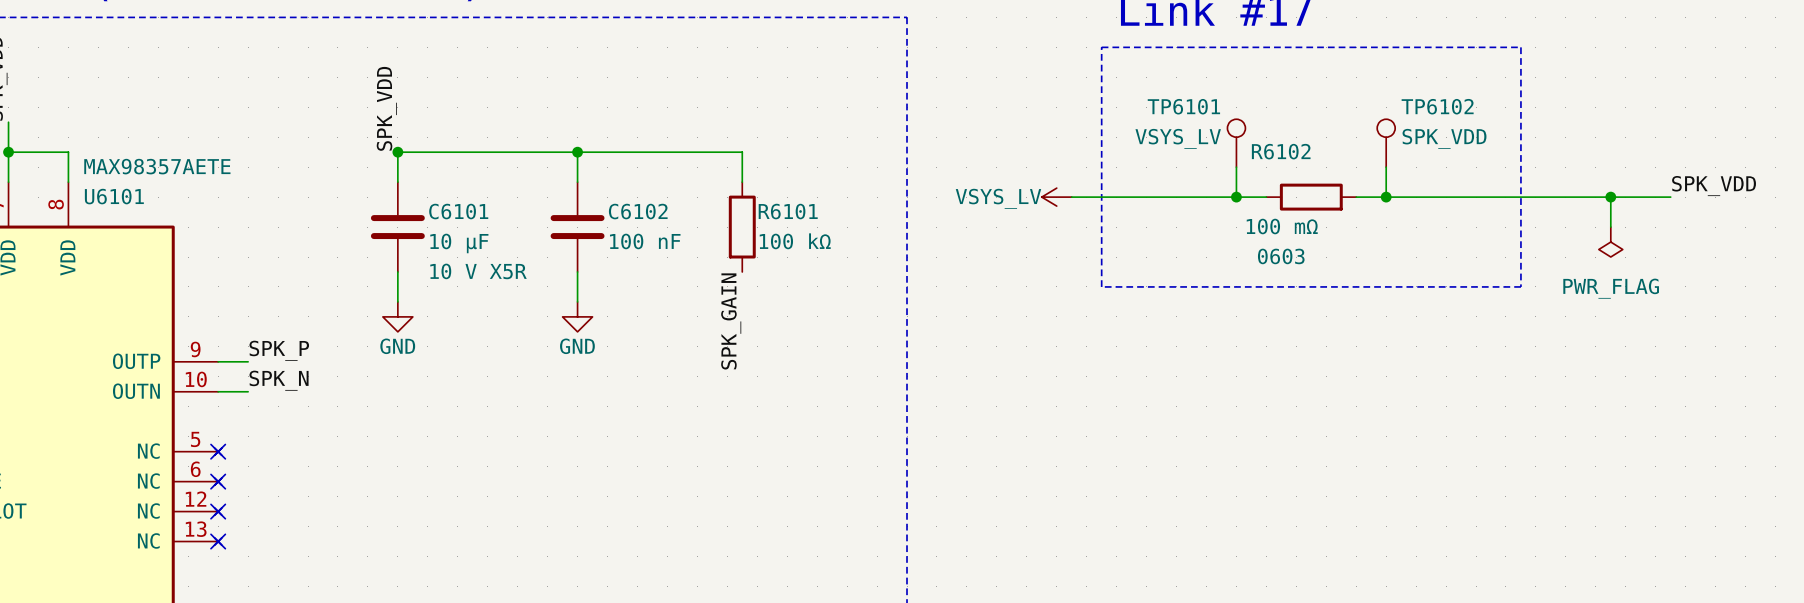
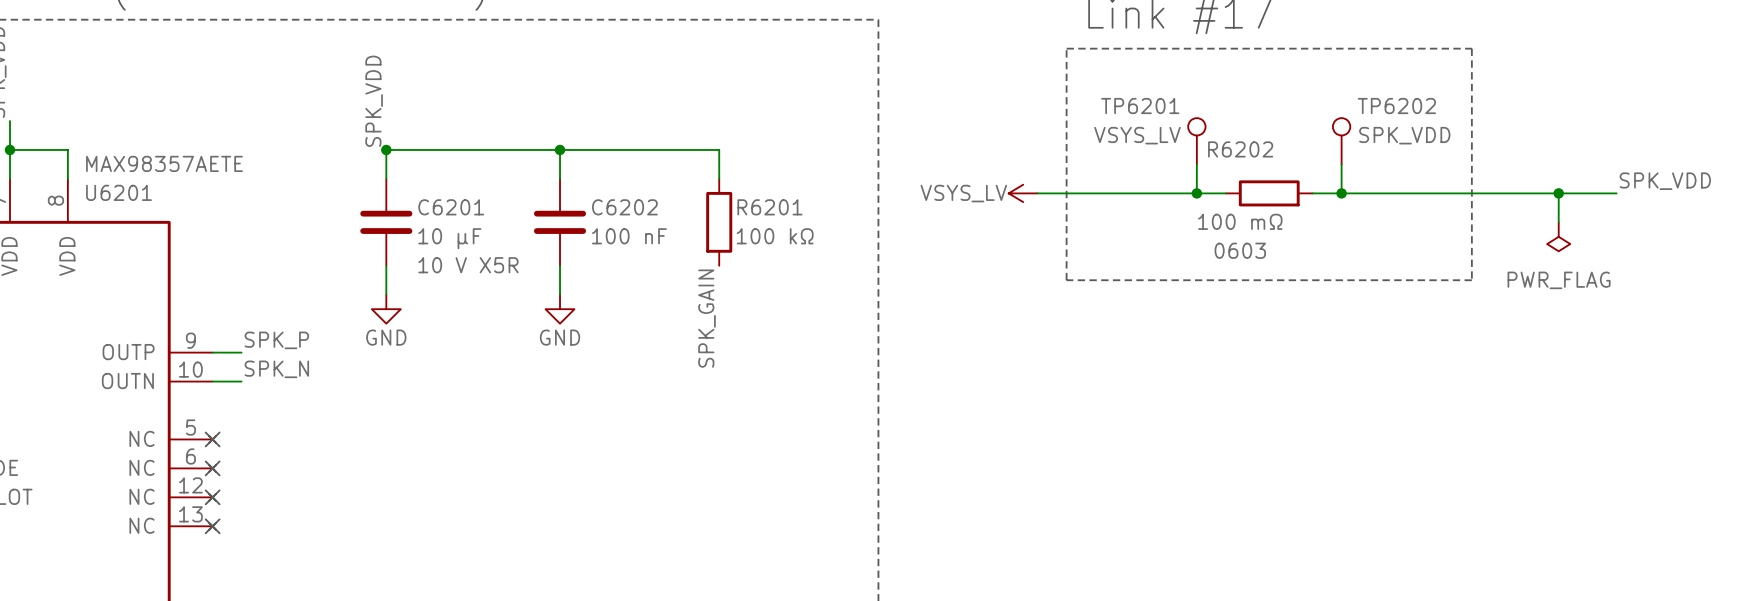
TP6101 name: TP6101 (1183, 106) -> TP6201 (1140, 106)
TP6102 name: TP6102 (1437, 106) -> TP6202 (1396, 106)
R6102 name: R6102 (1281, 151) -> R6202 (1240, 149)
U6101 name: U6101 (114, 196) -> U6201 (119, 192)
C6101 name: C6101 (458, 211) -> C6201 (451, 207)
C6102 name: C6102 (638, 211) -> C6202 (624, 207)
R6101 name: R6101 (788, 211) -> R6201 (769, 207)

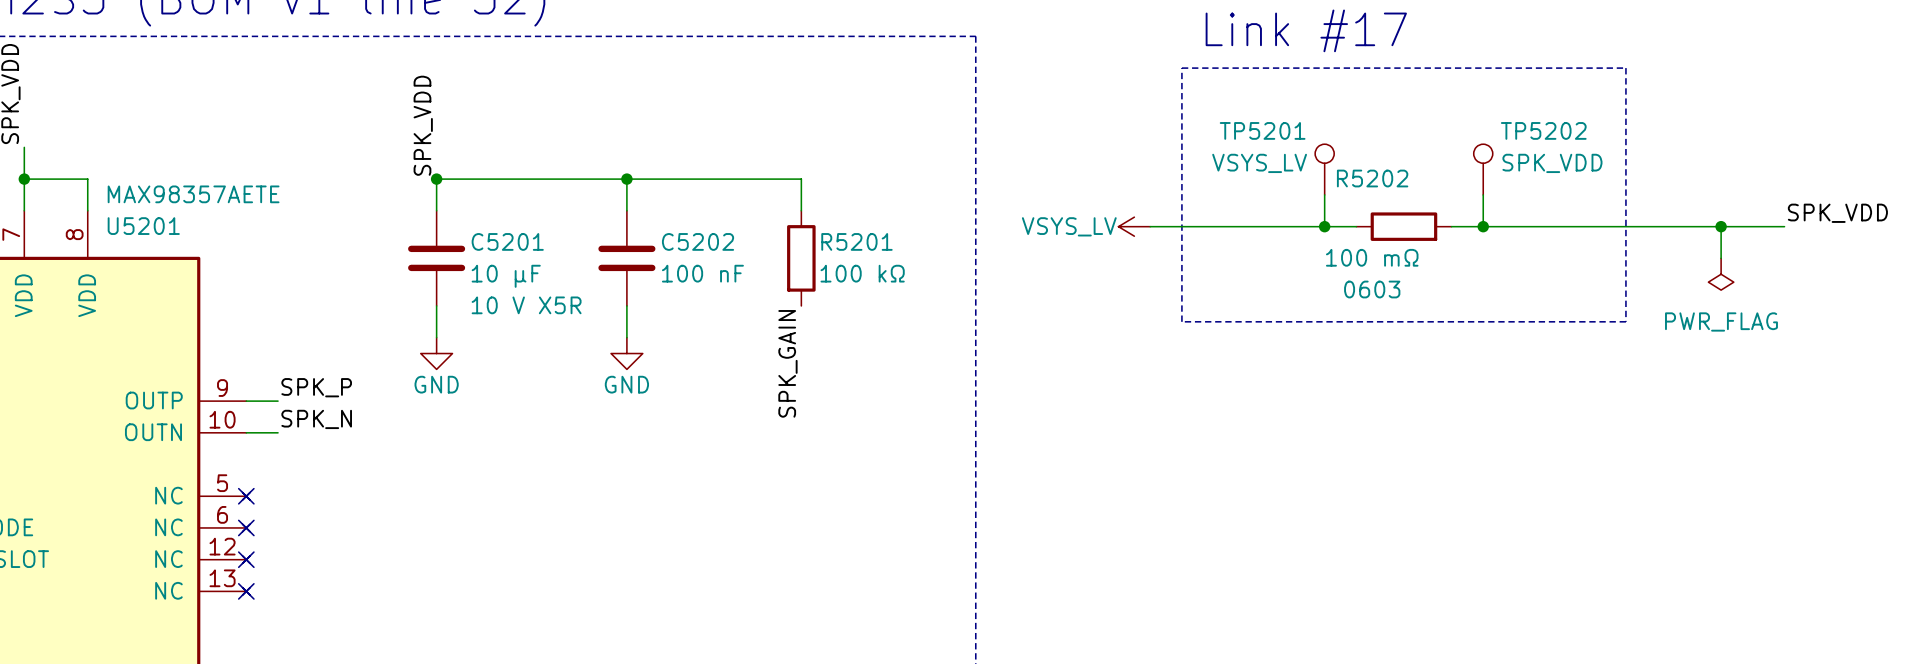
TP6201 name: TP6201 (1140, 106) -> TP5201 (1262, 130)
TP6202 name: TP6202 (1396, 106) -> TP5202 (1543, 130)
R6202 name: R6202 (1240, 149) -> R5202 (1372, 178)
U6201 name: U6201 (119, 192) -> U5201 (143, 226)
C6201 name: C6201 (451, 207) -> C5201 (507, 241)
C6202 name: C6202 (624, 207) -> C5202 (698, 241)
R6201 name: R6201 (769, 207) -> R5201 (856, 241)

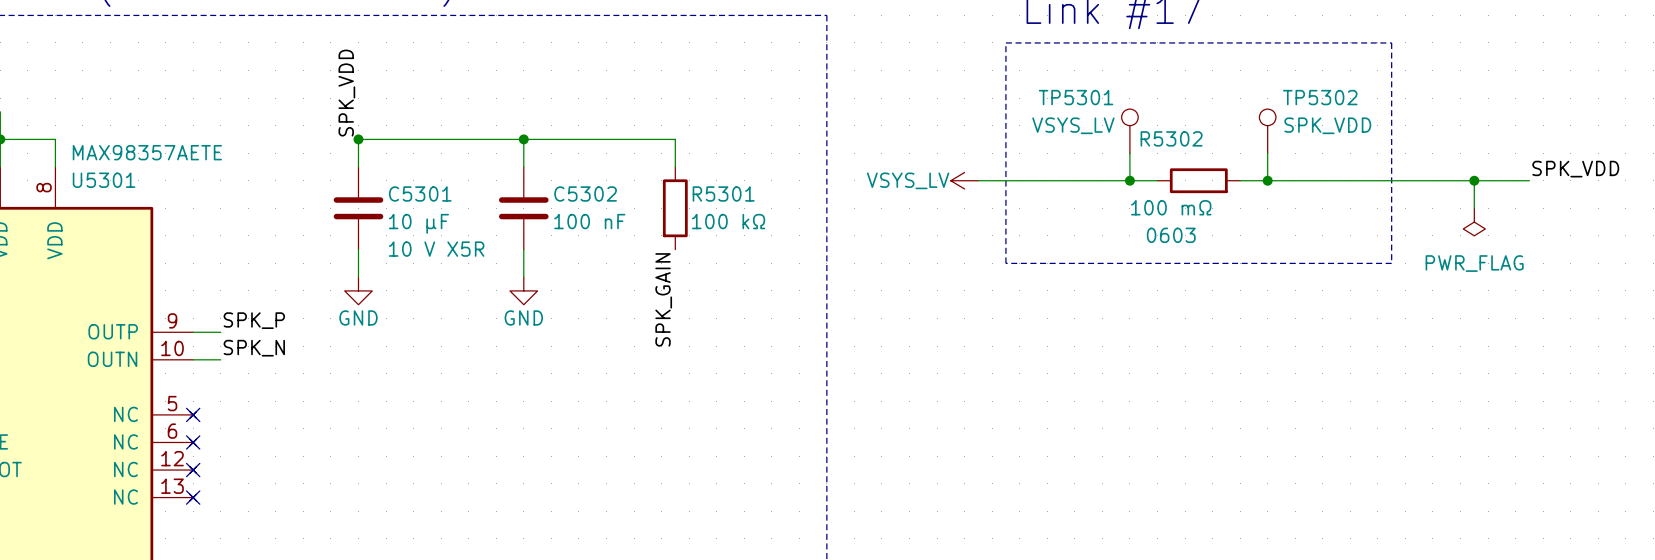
TP5201 name: TP5201 (1262, 130) -> TP5301 (1076, 97)
TP5202 name: TP5202 (1543, 130) -> TP5302 (1320, 97)
R5202 name: R5202 (1372, 178) -> R5302 (1171, 138)
U5201 name: U5201 (143, 226) -> U5301 (104, 180)
C5201 name: C5201 (507, 241) -> C5301 (420, 193)
C5202 name: C5202 (698, 241) -> C5302 (585, 193)
R5201 name: R5201 (856, 241) -> R5301 (723, 193)

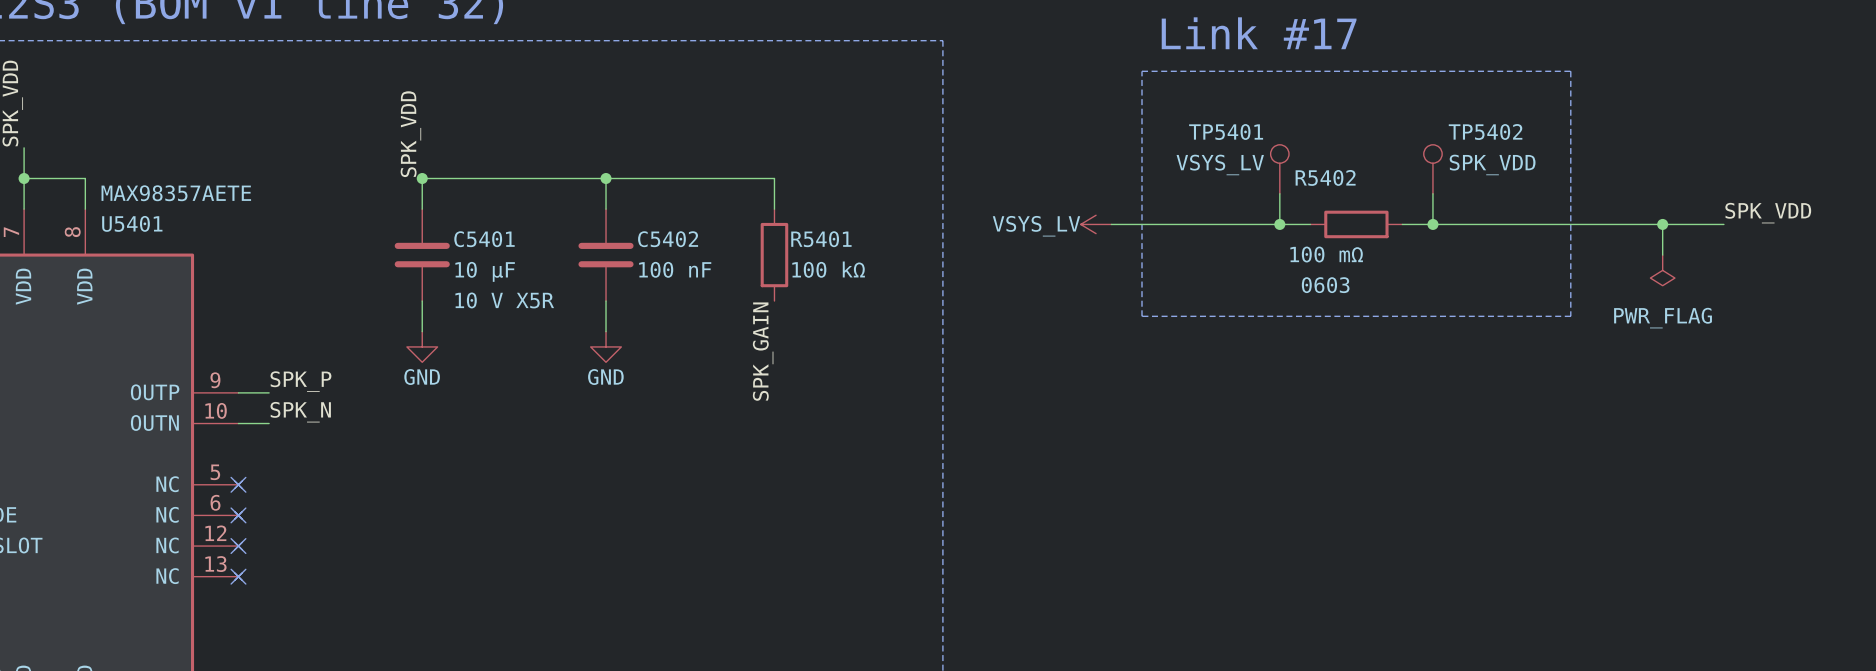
TP5301 name: TP5301 (1076, 97) -> TP5401 (1226, 132)
TP5302 name: TP5302 (1320, 97) -> TP5402 (1485, 132)
R5302 name: R5302 (1171, 138) -> R5402 (1325, 177)
U5301 name: U5301 (104, 180) -> U5401 (132, 223)
C5301 name: C5301 (420, 193) -> C5401 (484, 239)
C5302 name: C5302 (585, 193) -> C5402 (668, 239)
R5301 name: R5301 (723, 193) -> R5401 (821, 239)

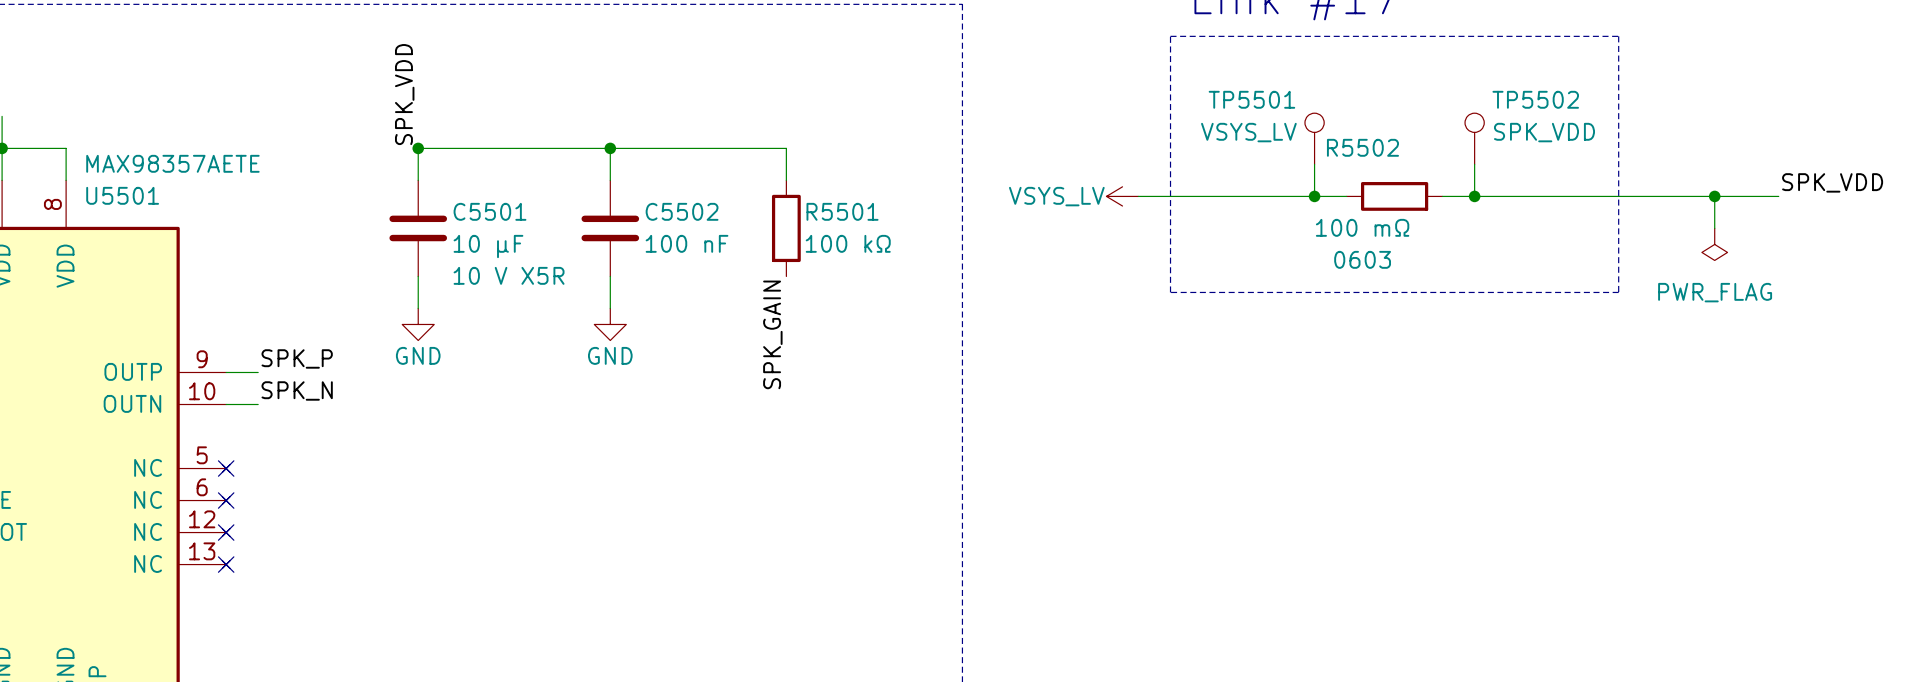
TP5401 name: TP5401 (1226, 132) -> TP5501 (1251, 99)
TP5402 name: TP5402 (1485, 132) -> TP5502 (1535, 99)
R5402 name: R5402 (1325, 177) -> R5502 (1362, 147)
U5401 name: U5401 (132, 223) -> U5501 (122, 195)
C5401 name: C5401 (484, 239) -> C5501 (490, 211)
C5402 name: C5402 (668, 239) -> C5502 (682, 211)
R5401 name: R5401 (821, 239) -> R5501 (842, 211)

